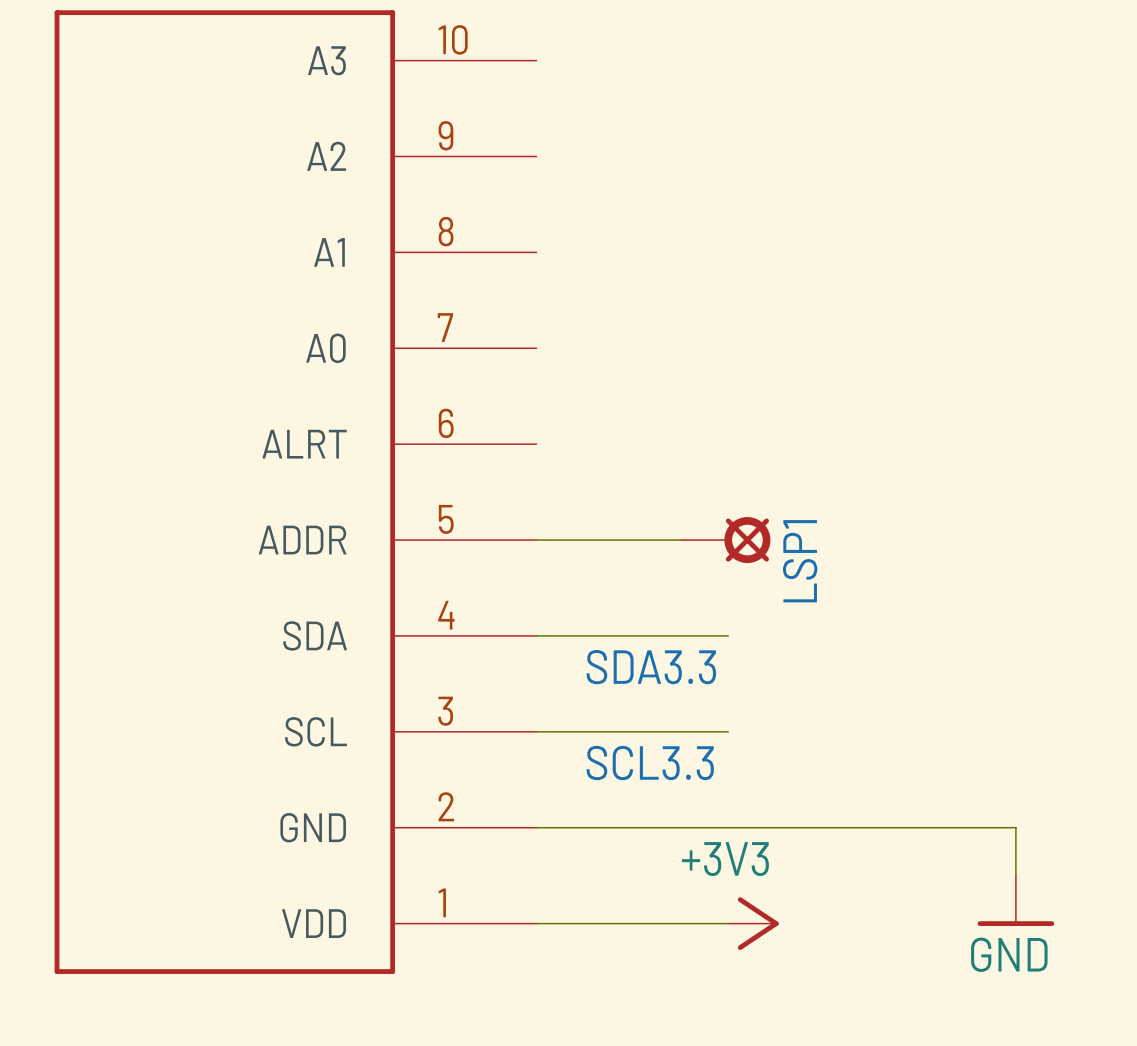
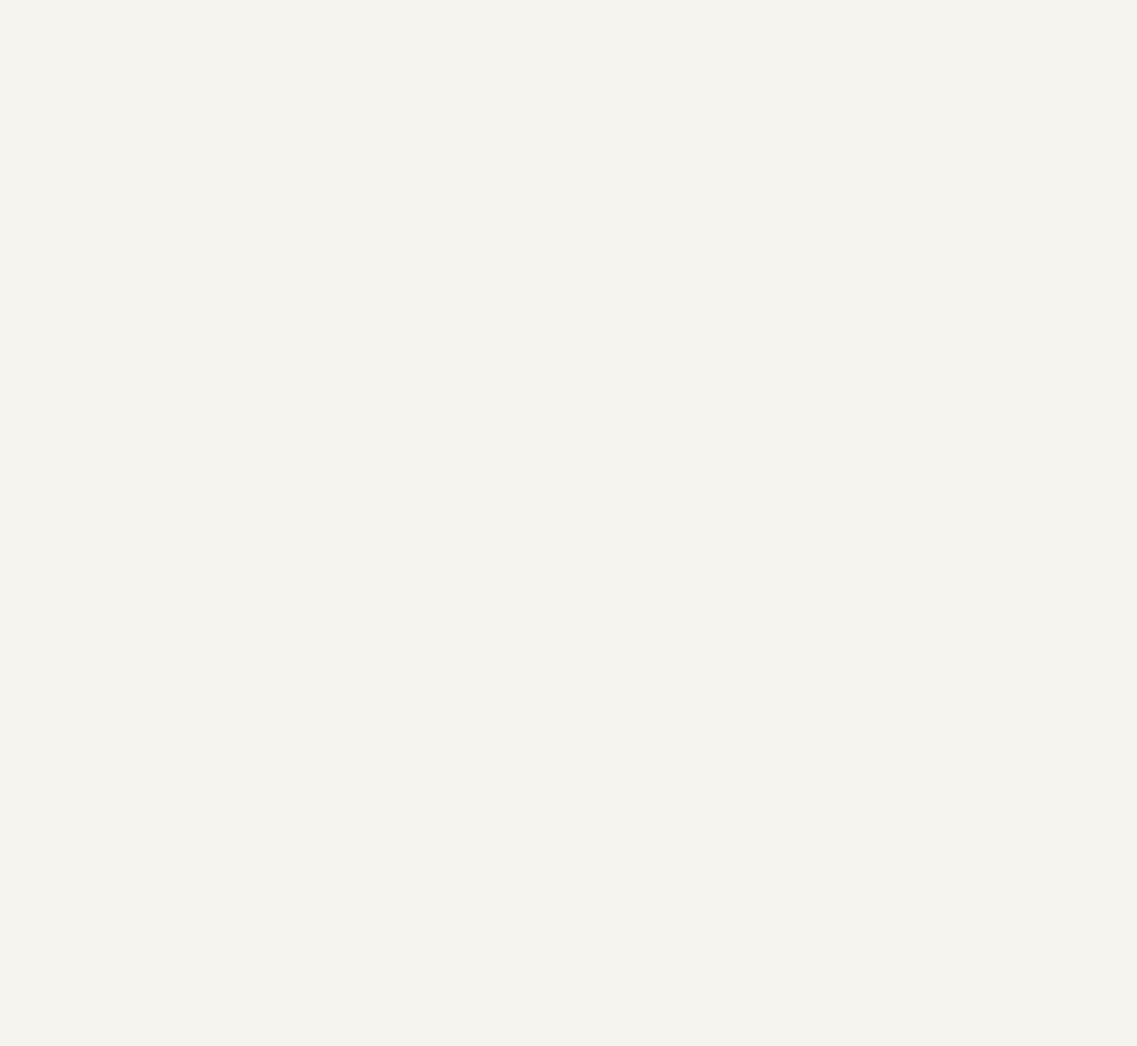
part: (295, 492) -> none
wire: (536, 540) (680, 540) -> none
LSP1: (725, 540) -> none
wire: (536, 635) (728, 635) -> none
text: SDA3.3 (651, 667) -> none
wire: (536, 731) (728, 731) -> none
text: SCL3.3 (650, 763) -> none
wire: (536, 827) (1015, 827) (1015, 875) -> none
power symbol: GND (1015, 900) -> none
wire: (536, 923) (728, 923) -> none
power symbol: +3V3 (753, 923) -> none

